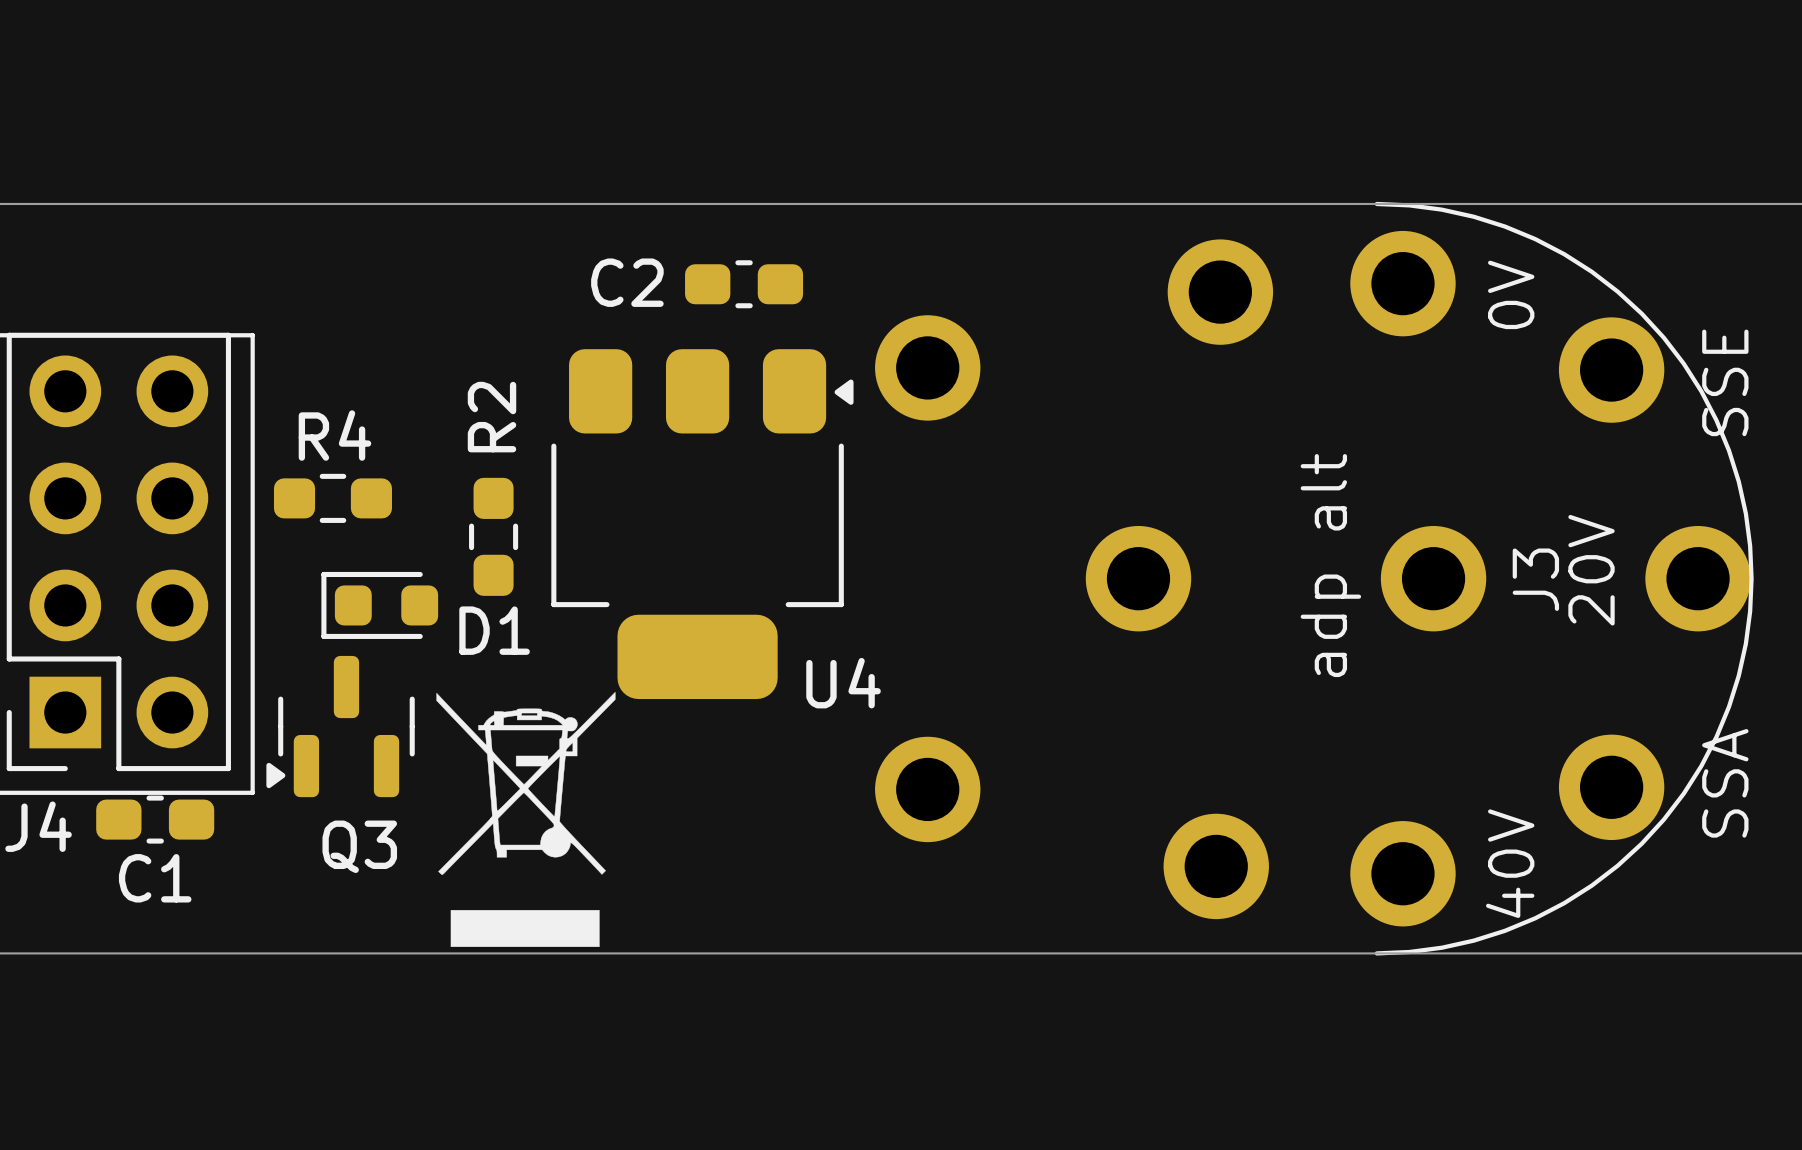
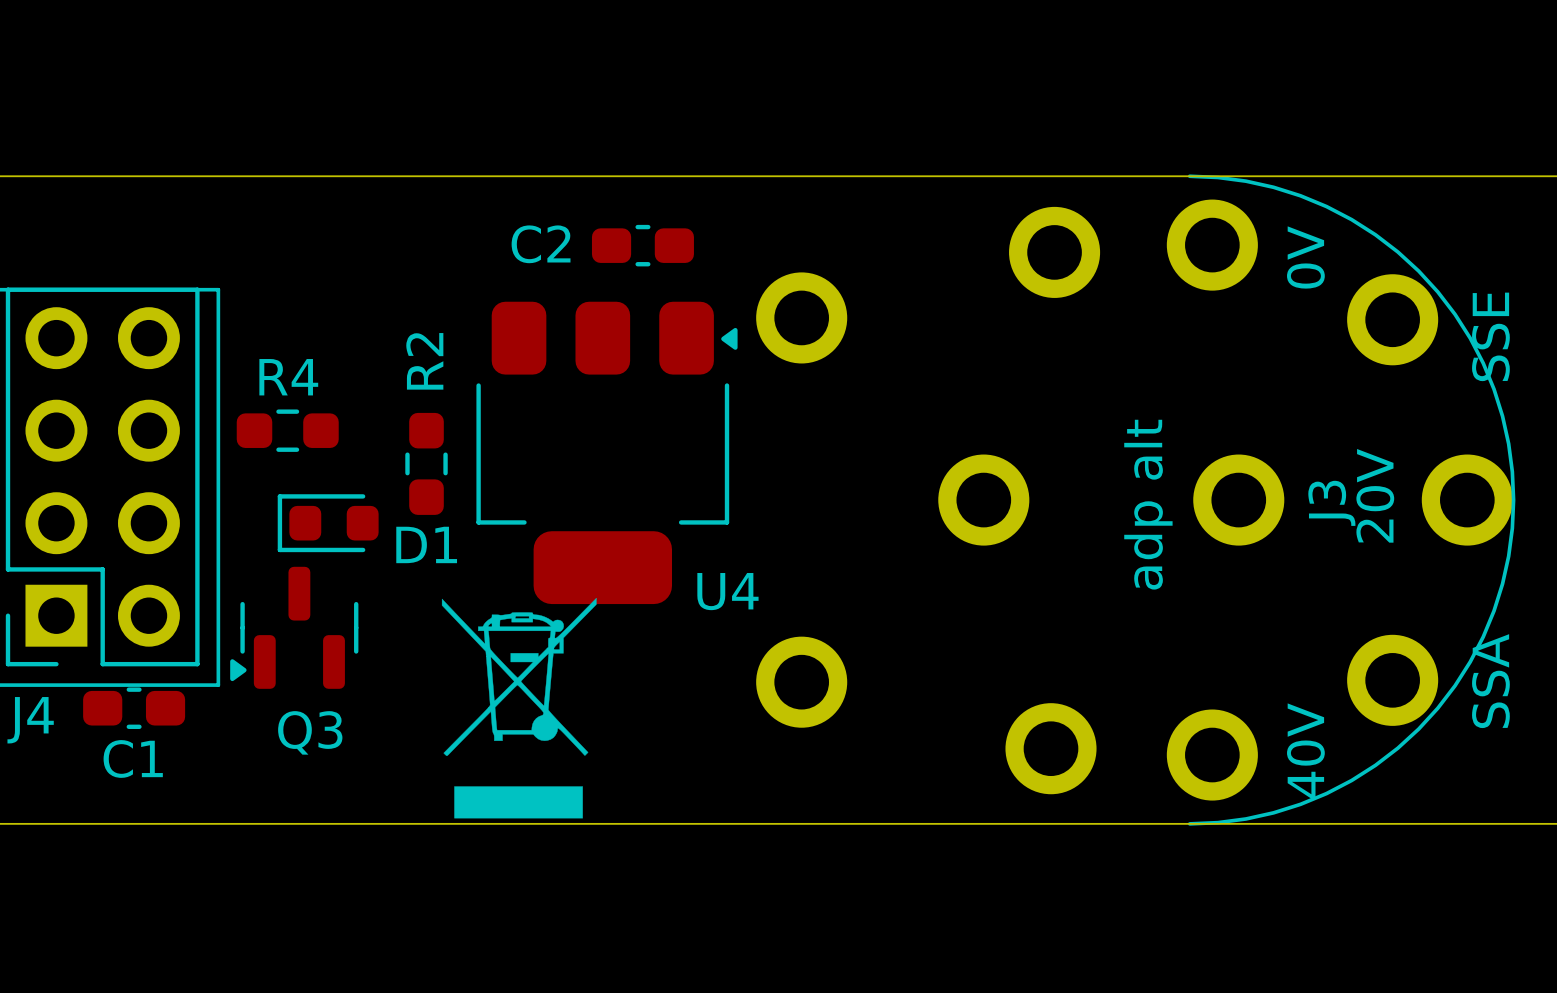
drawing position: (525, 819) -> (519, 708)

